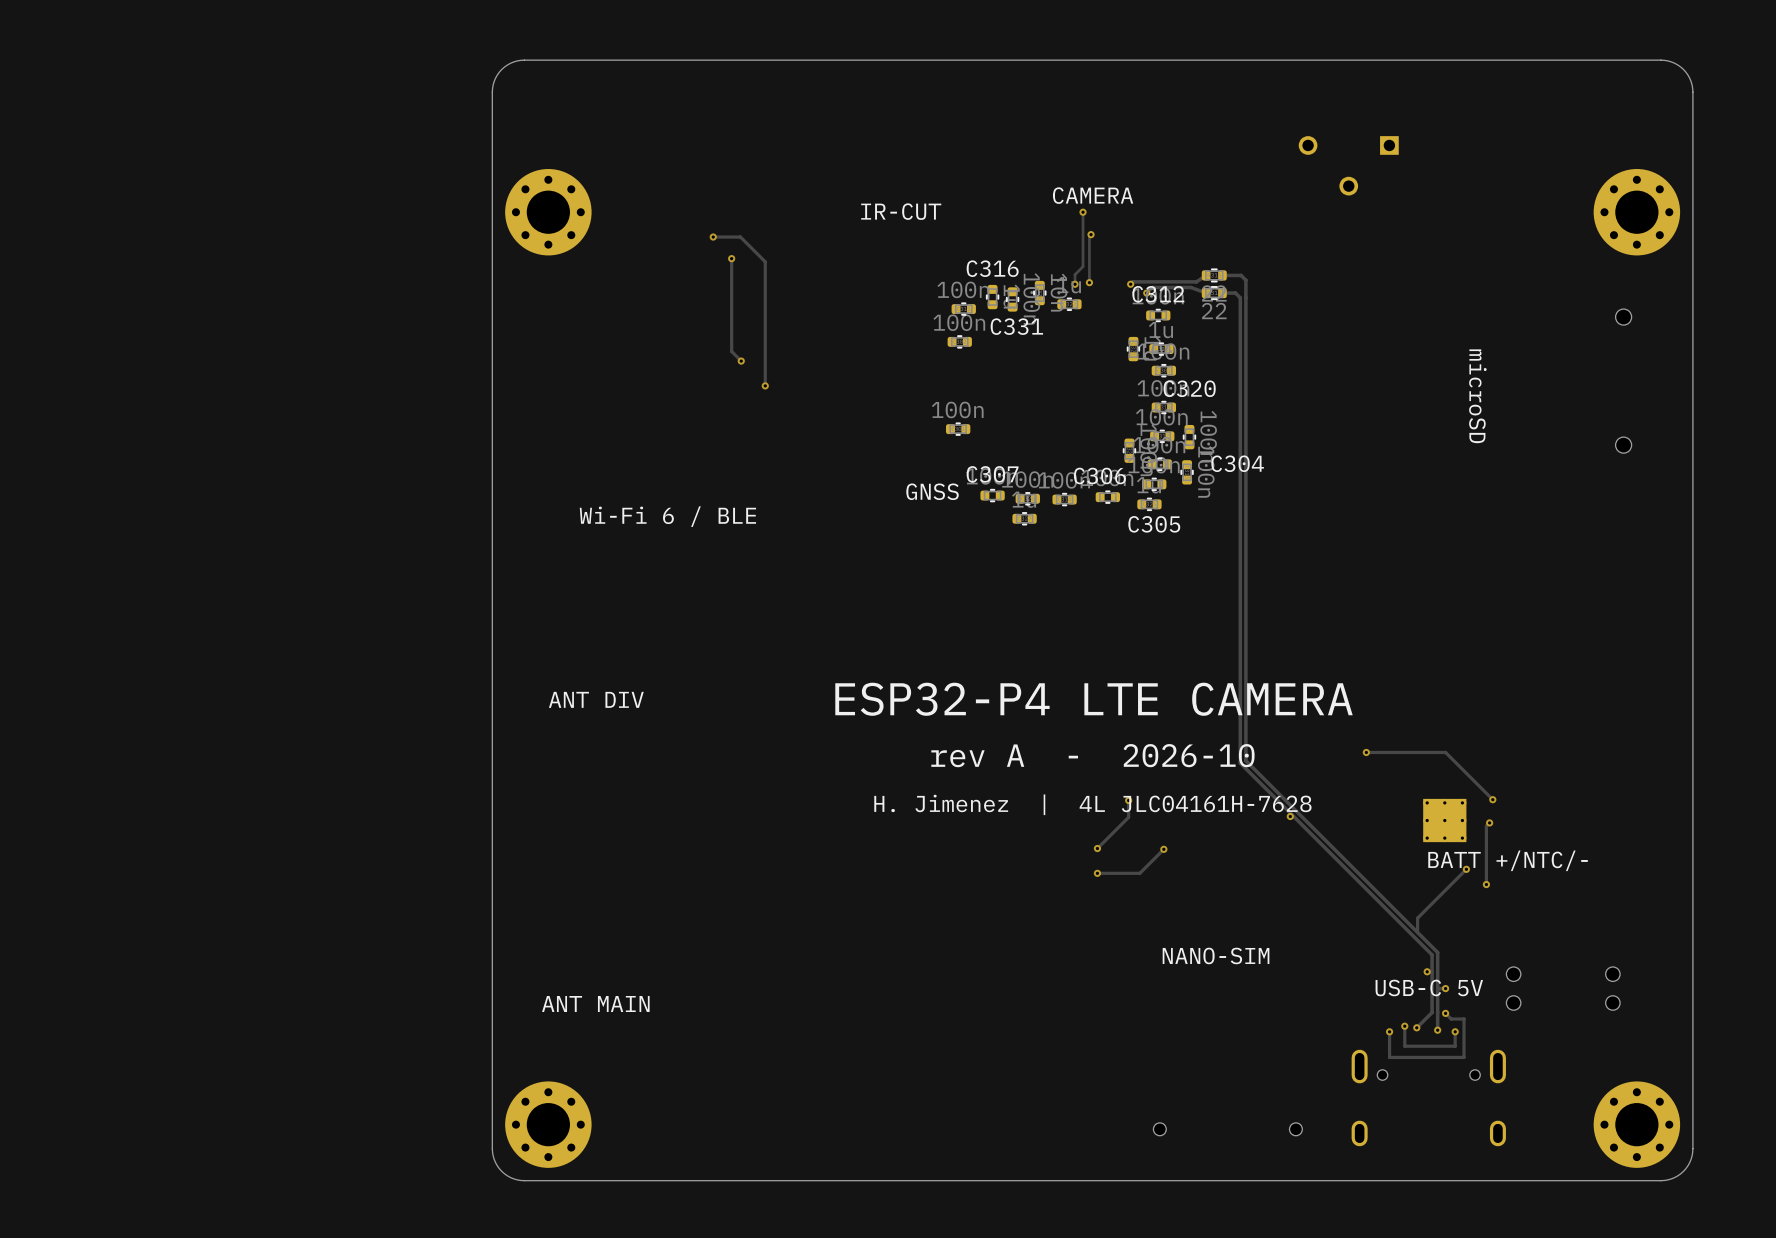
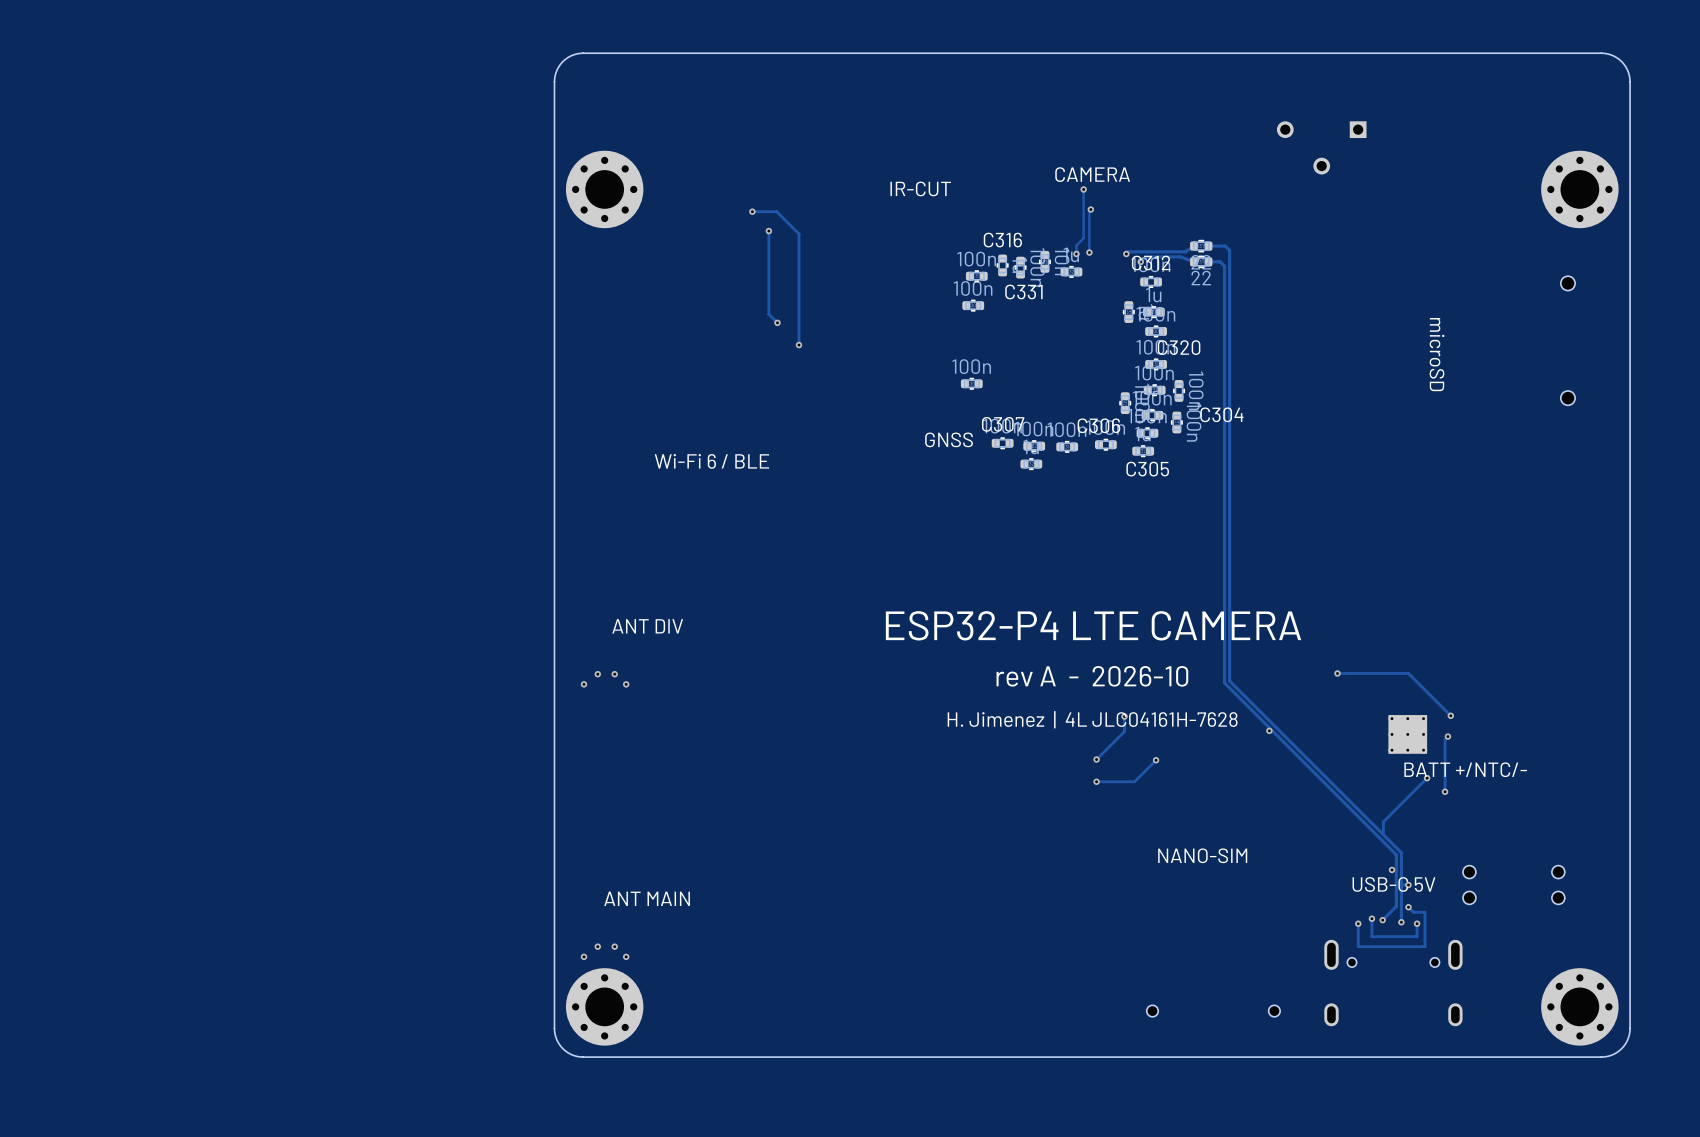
via: none -> (597, 674)
via: none -> (614, 674)
via: none -> (584, 684)
via: none -> (626, 684)
via: none -> (597, 946)
via: none -> (614, 946)
via: none -> (584, 956)
via: none -> (626, 956)

